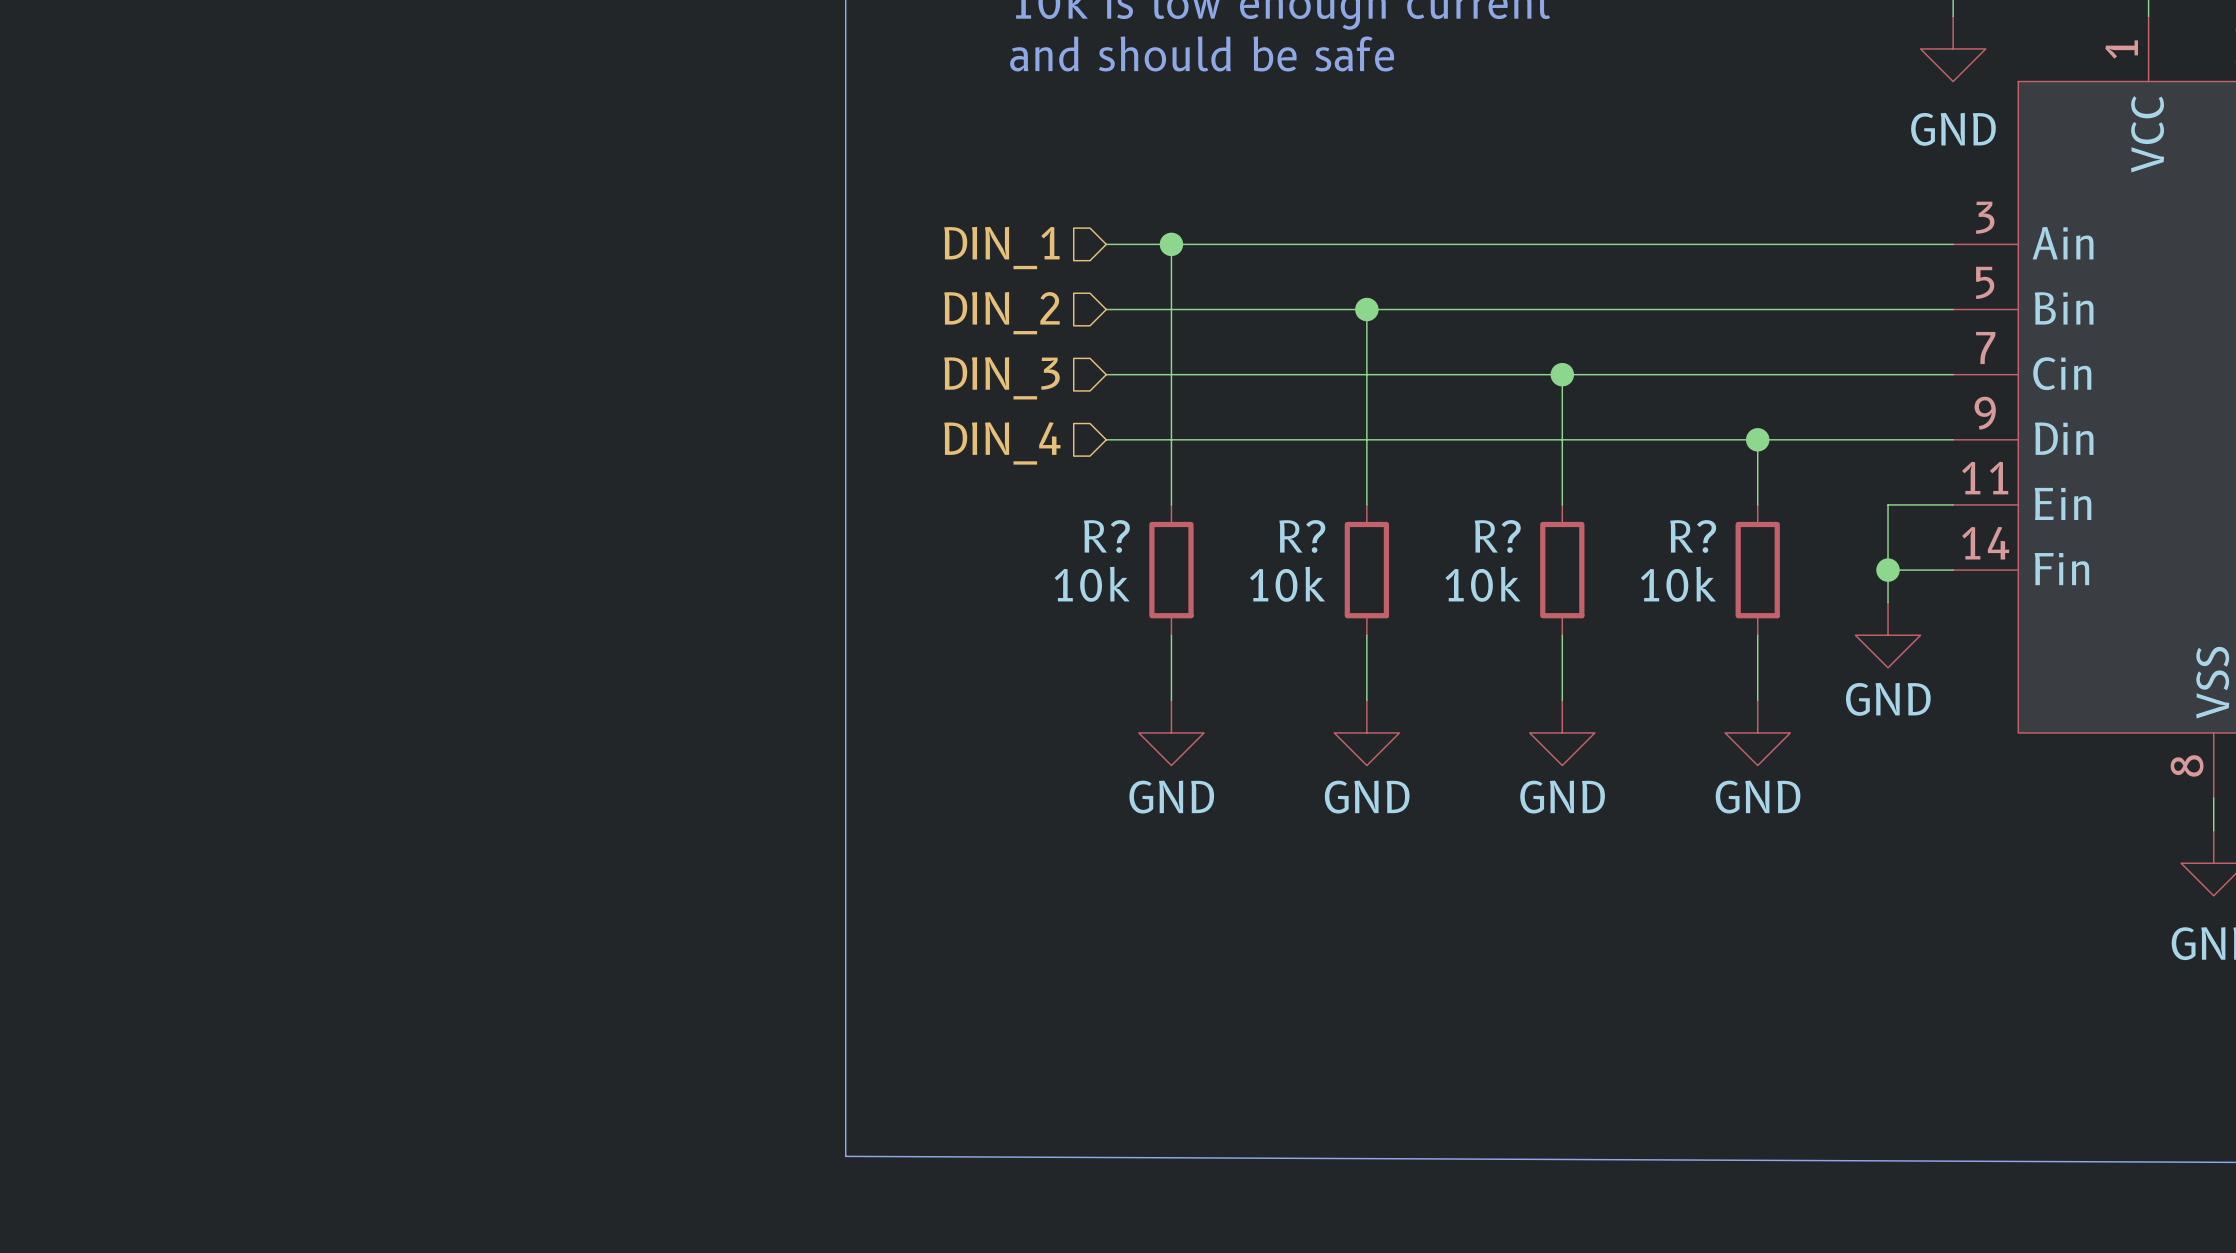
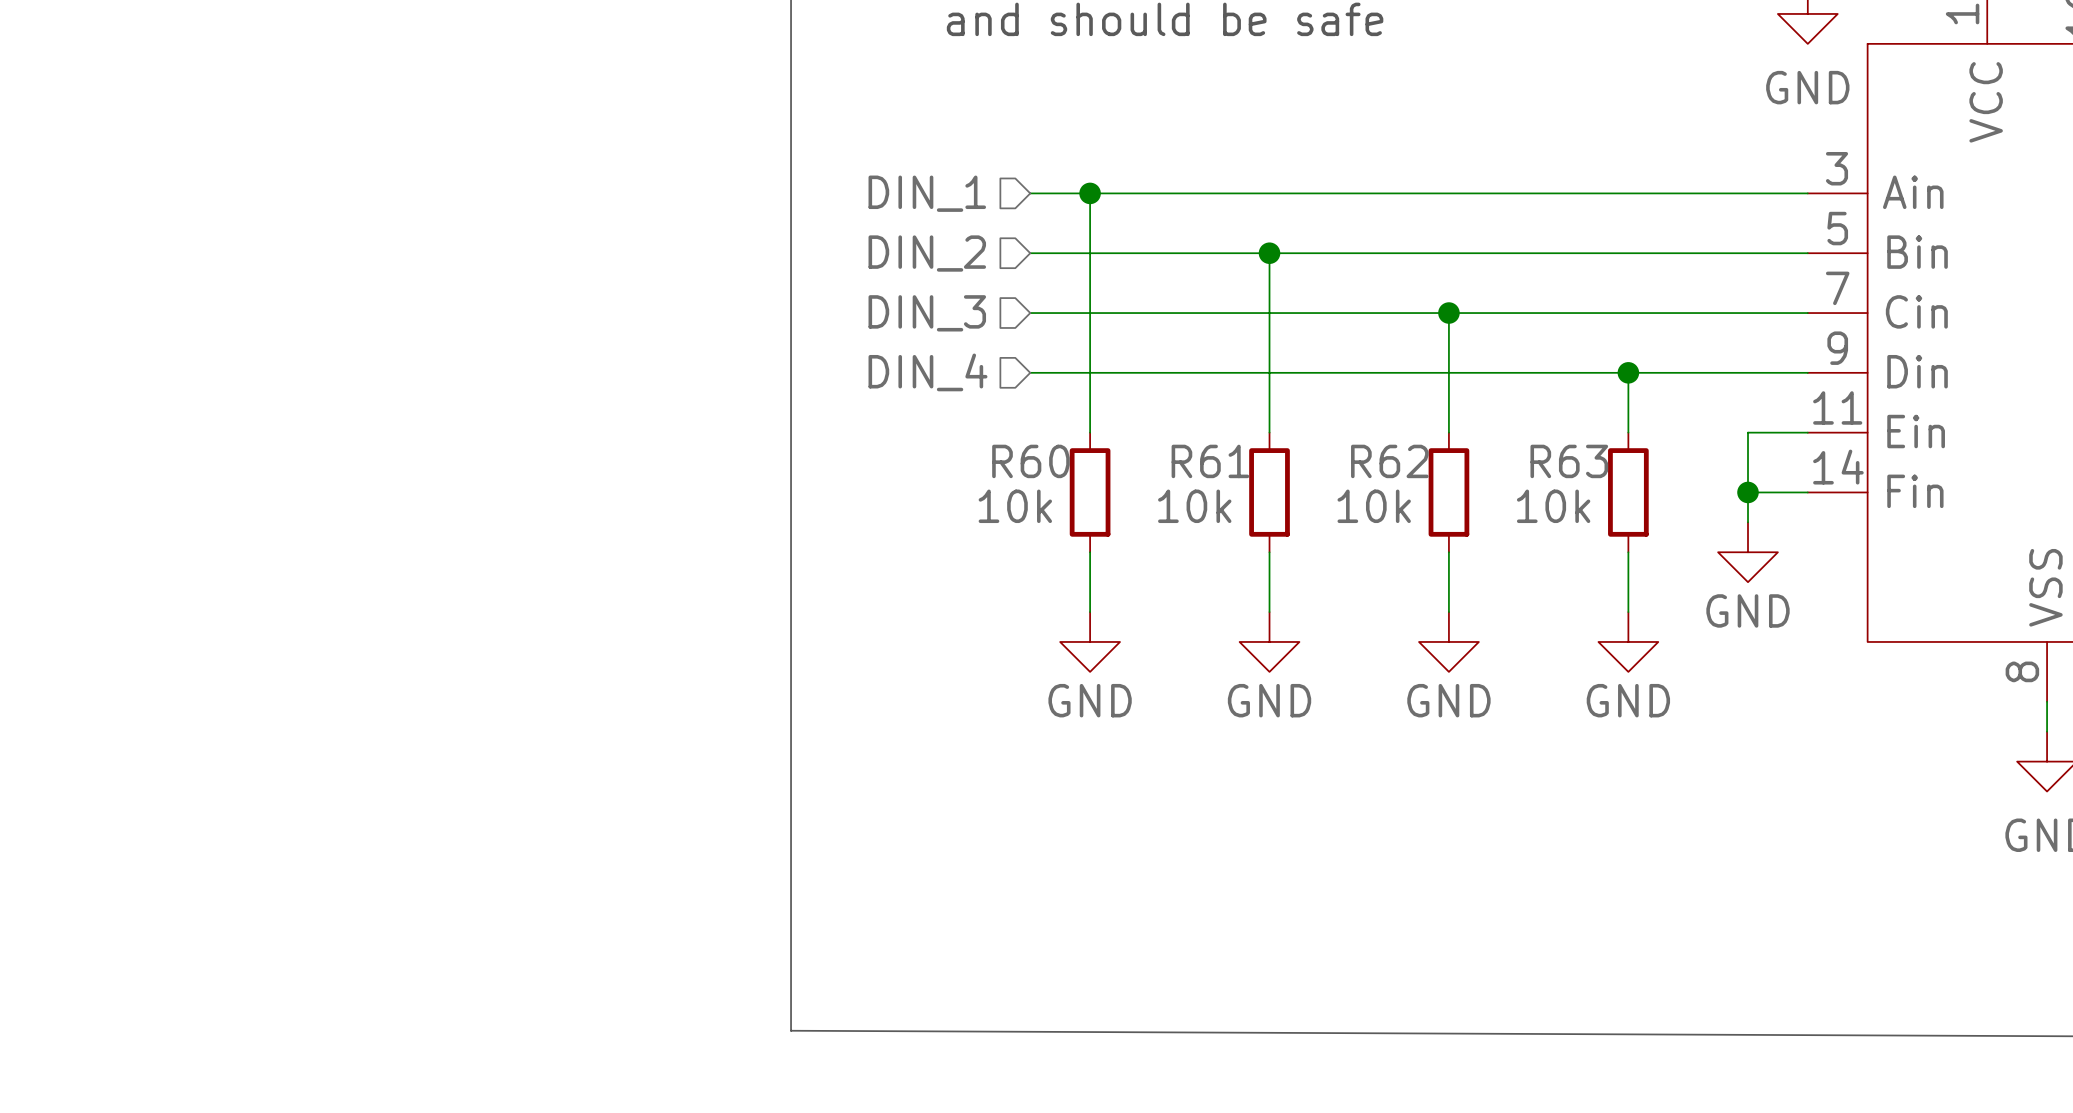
R? name: R? (1106, 536) -> R60 (1030, 461)
R? name: R? (1302, 536) -> R61 (1210, 461)
R? name: R? (1497, 536) -> R62 (1389, 461)
R? name: R? (1693, 536) -> R63 (1569, 461)

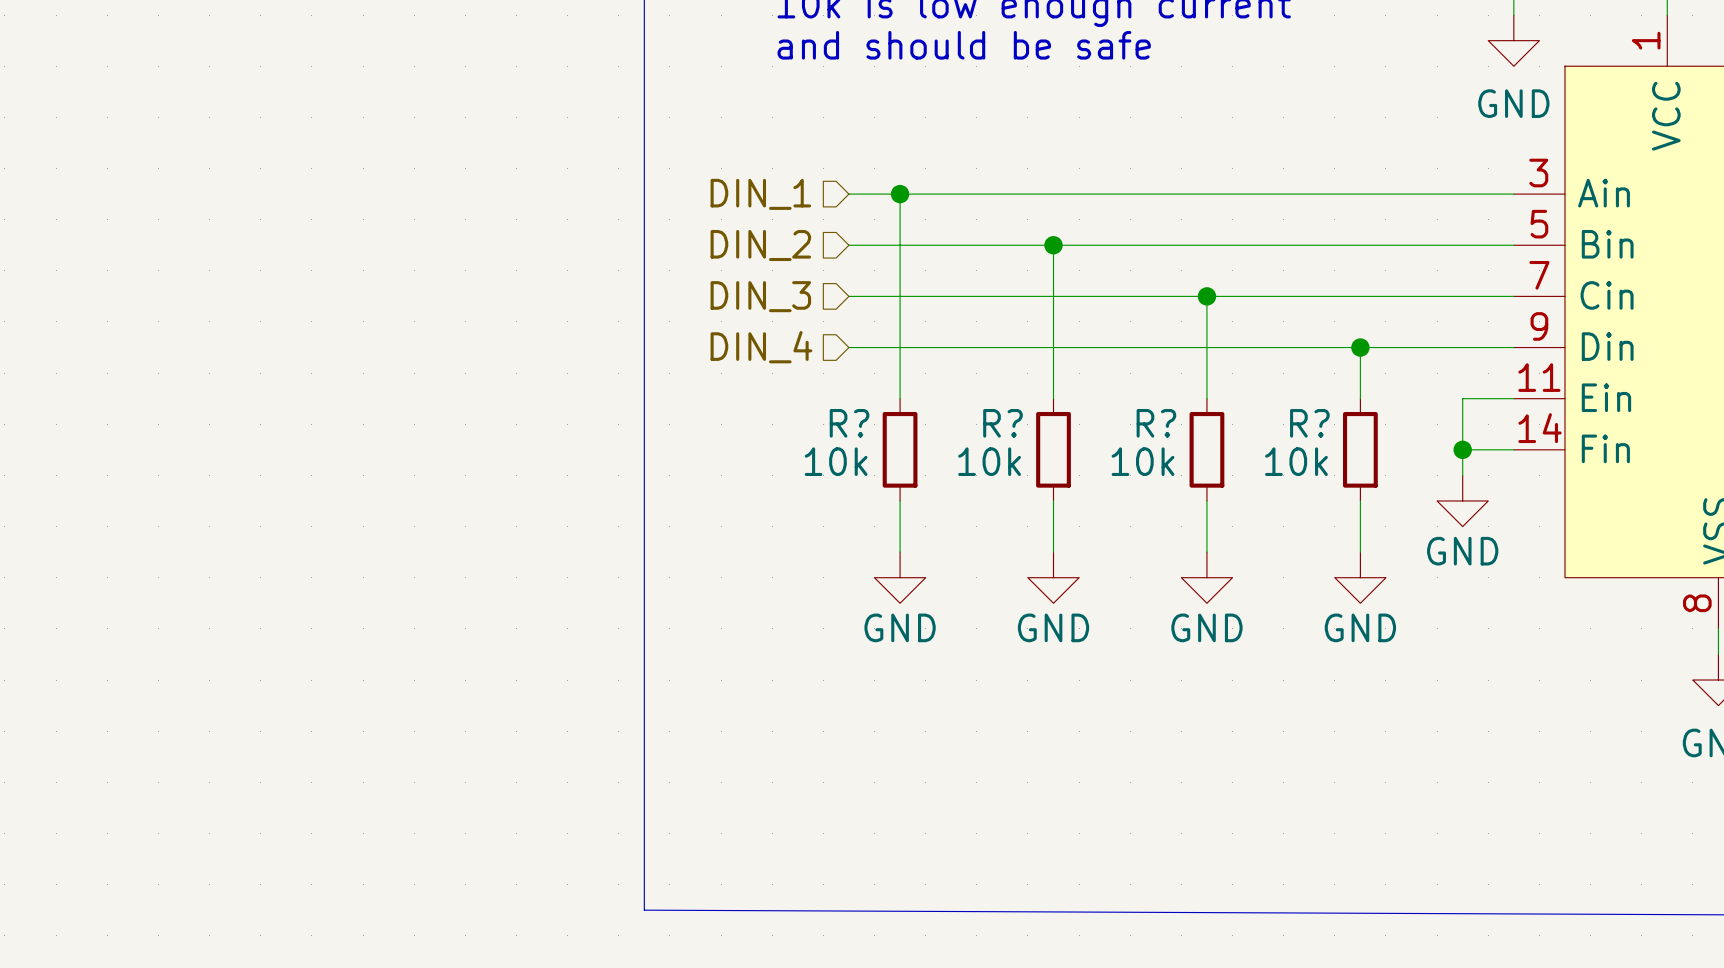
R60 name: R60 (1030, 461) -> R? (849, 423)
R61 name: R61 (1210, 461) -> R? (1002, 423)
R62 name: R62 (1389, 461) -> R? (1156, 423)
R63 name: R63 (1569, 461) -> R? (1309, 423)

